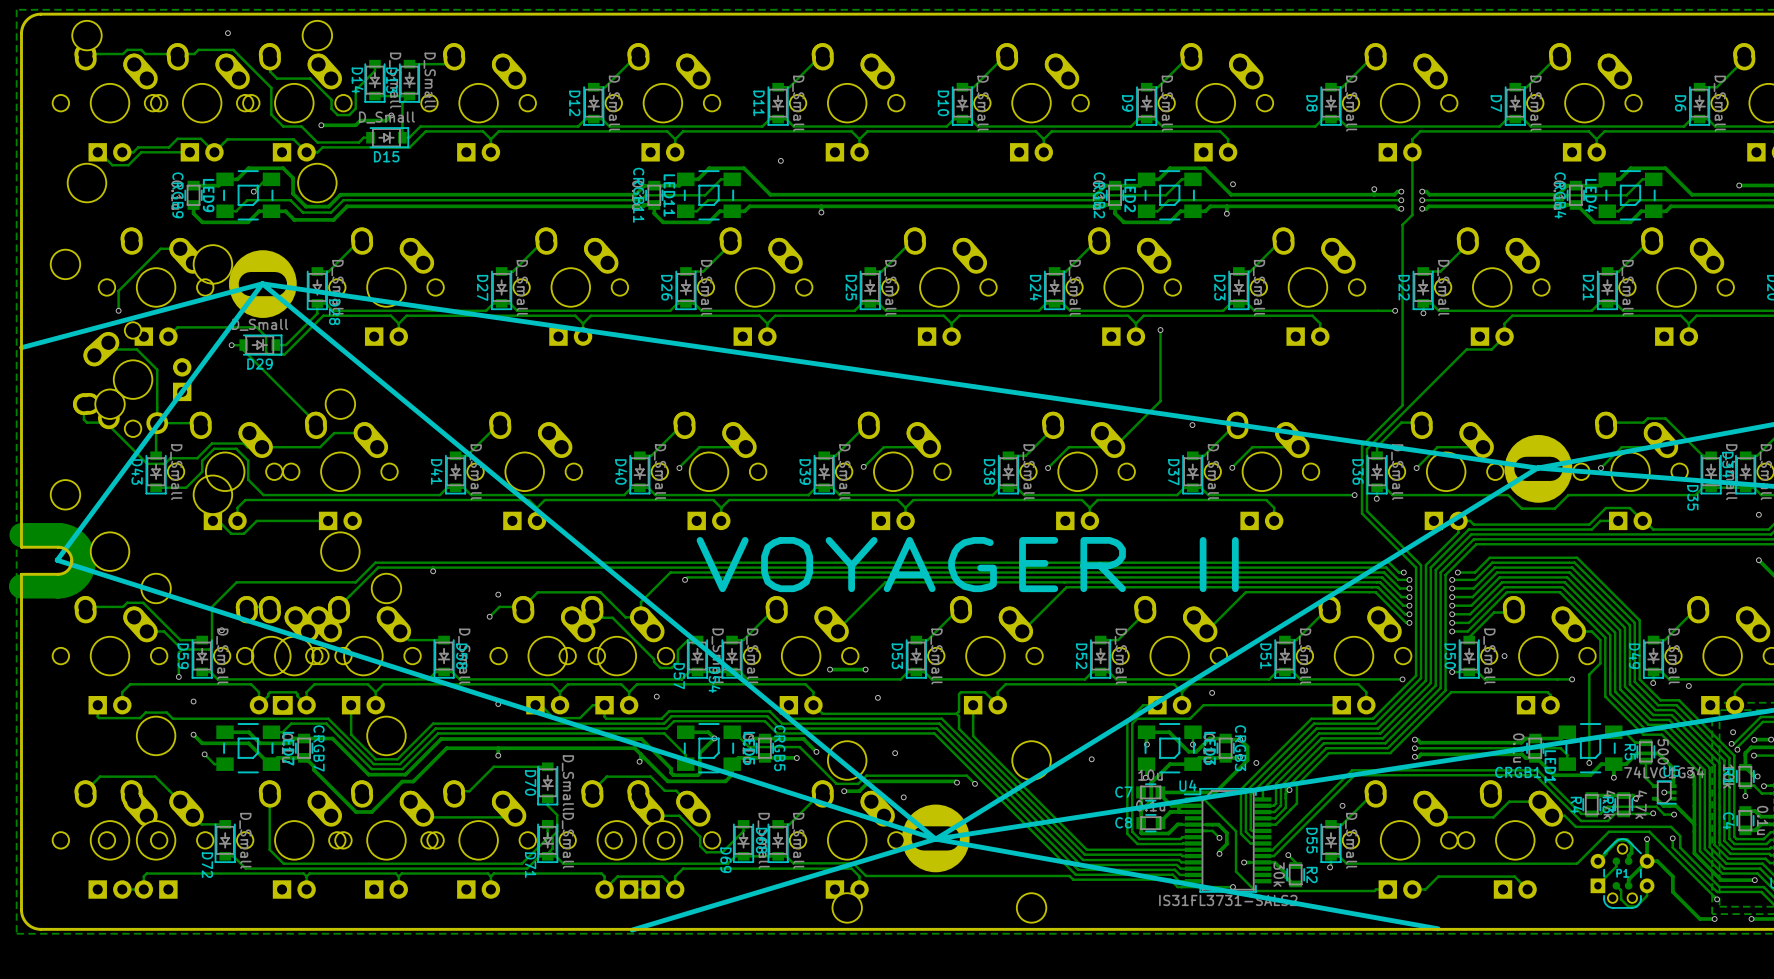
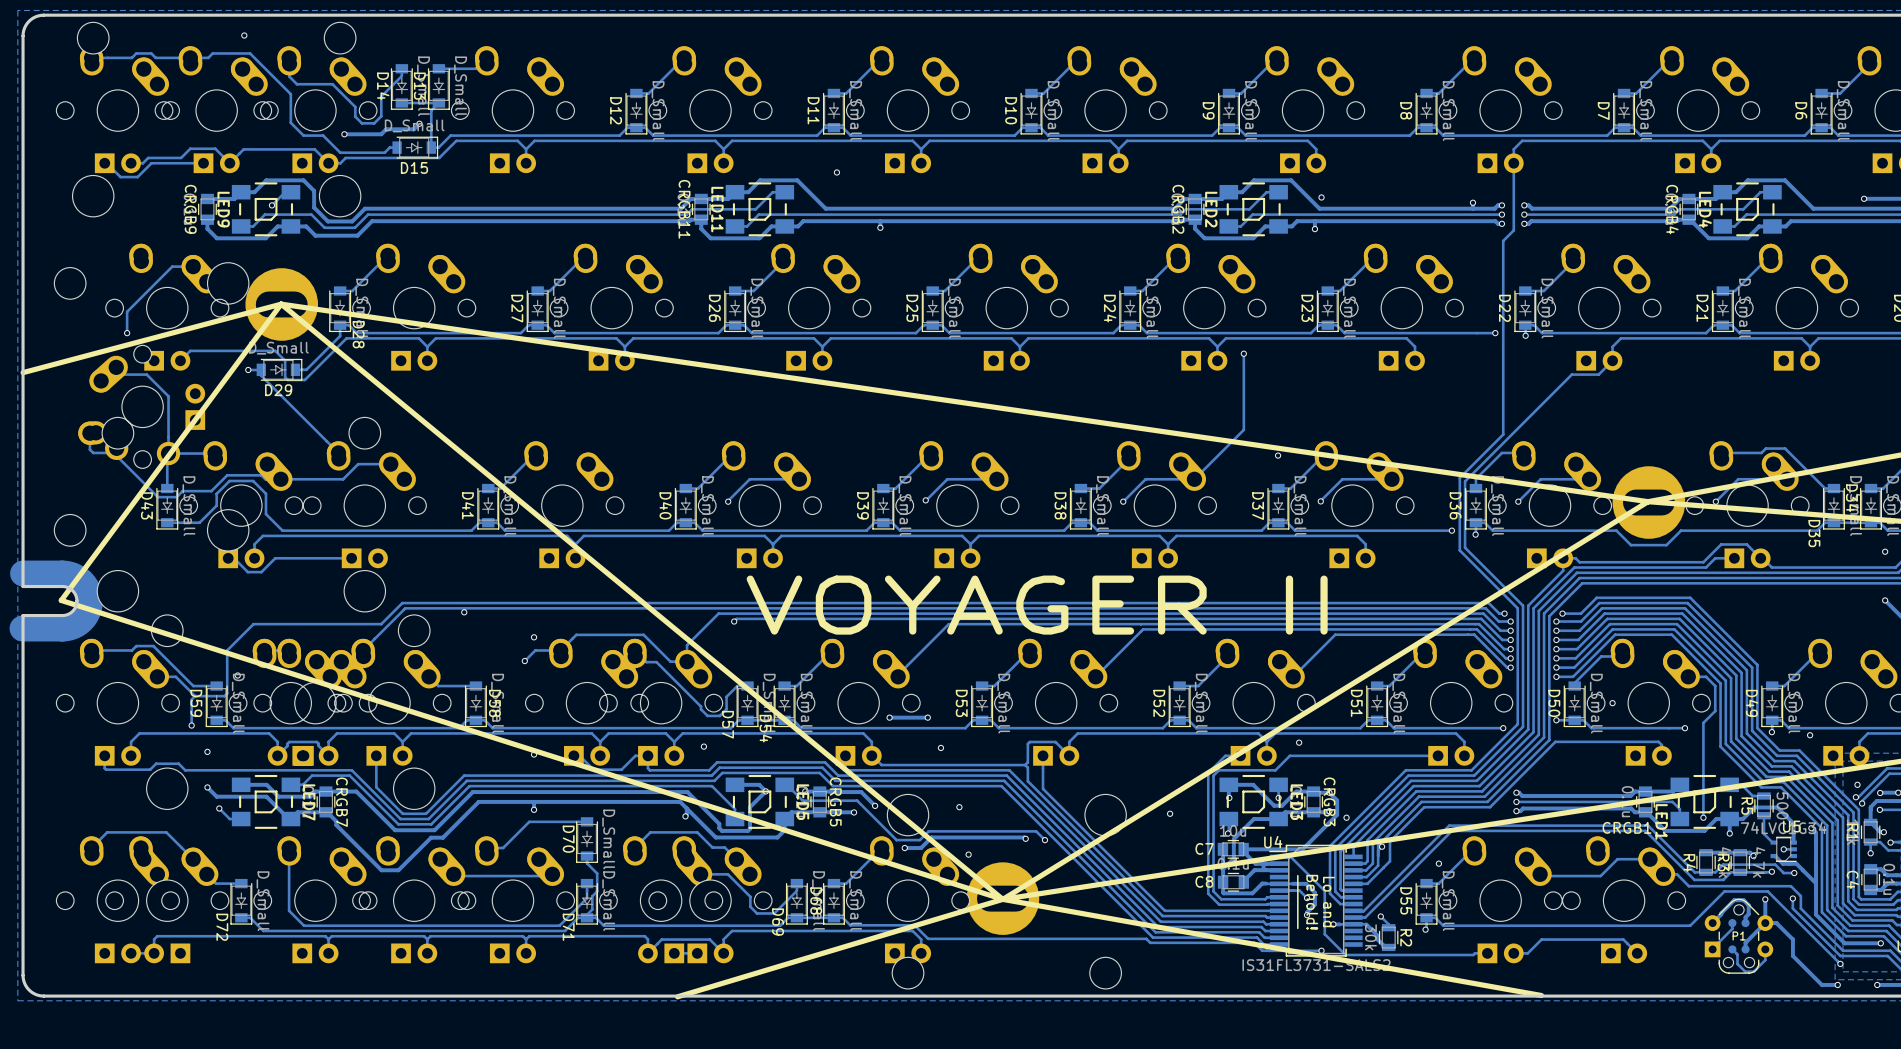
line: none -> (1297, 875) (1297, 928)
text: none -> Behold! (1312, 902)
text: none -> Lo and (1328, 902)

